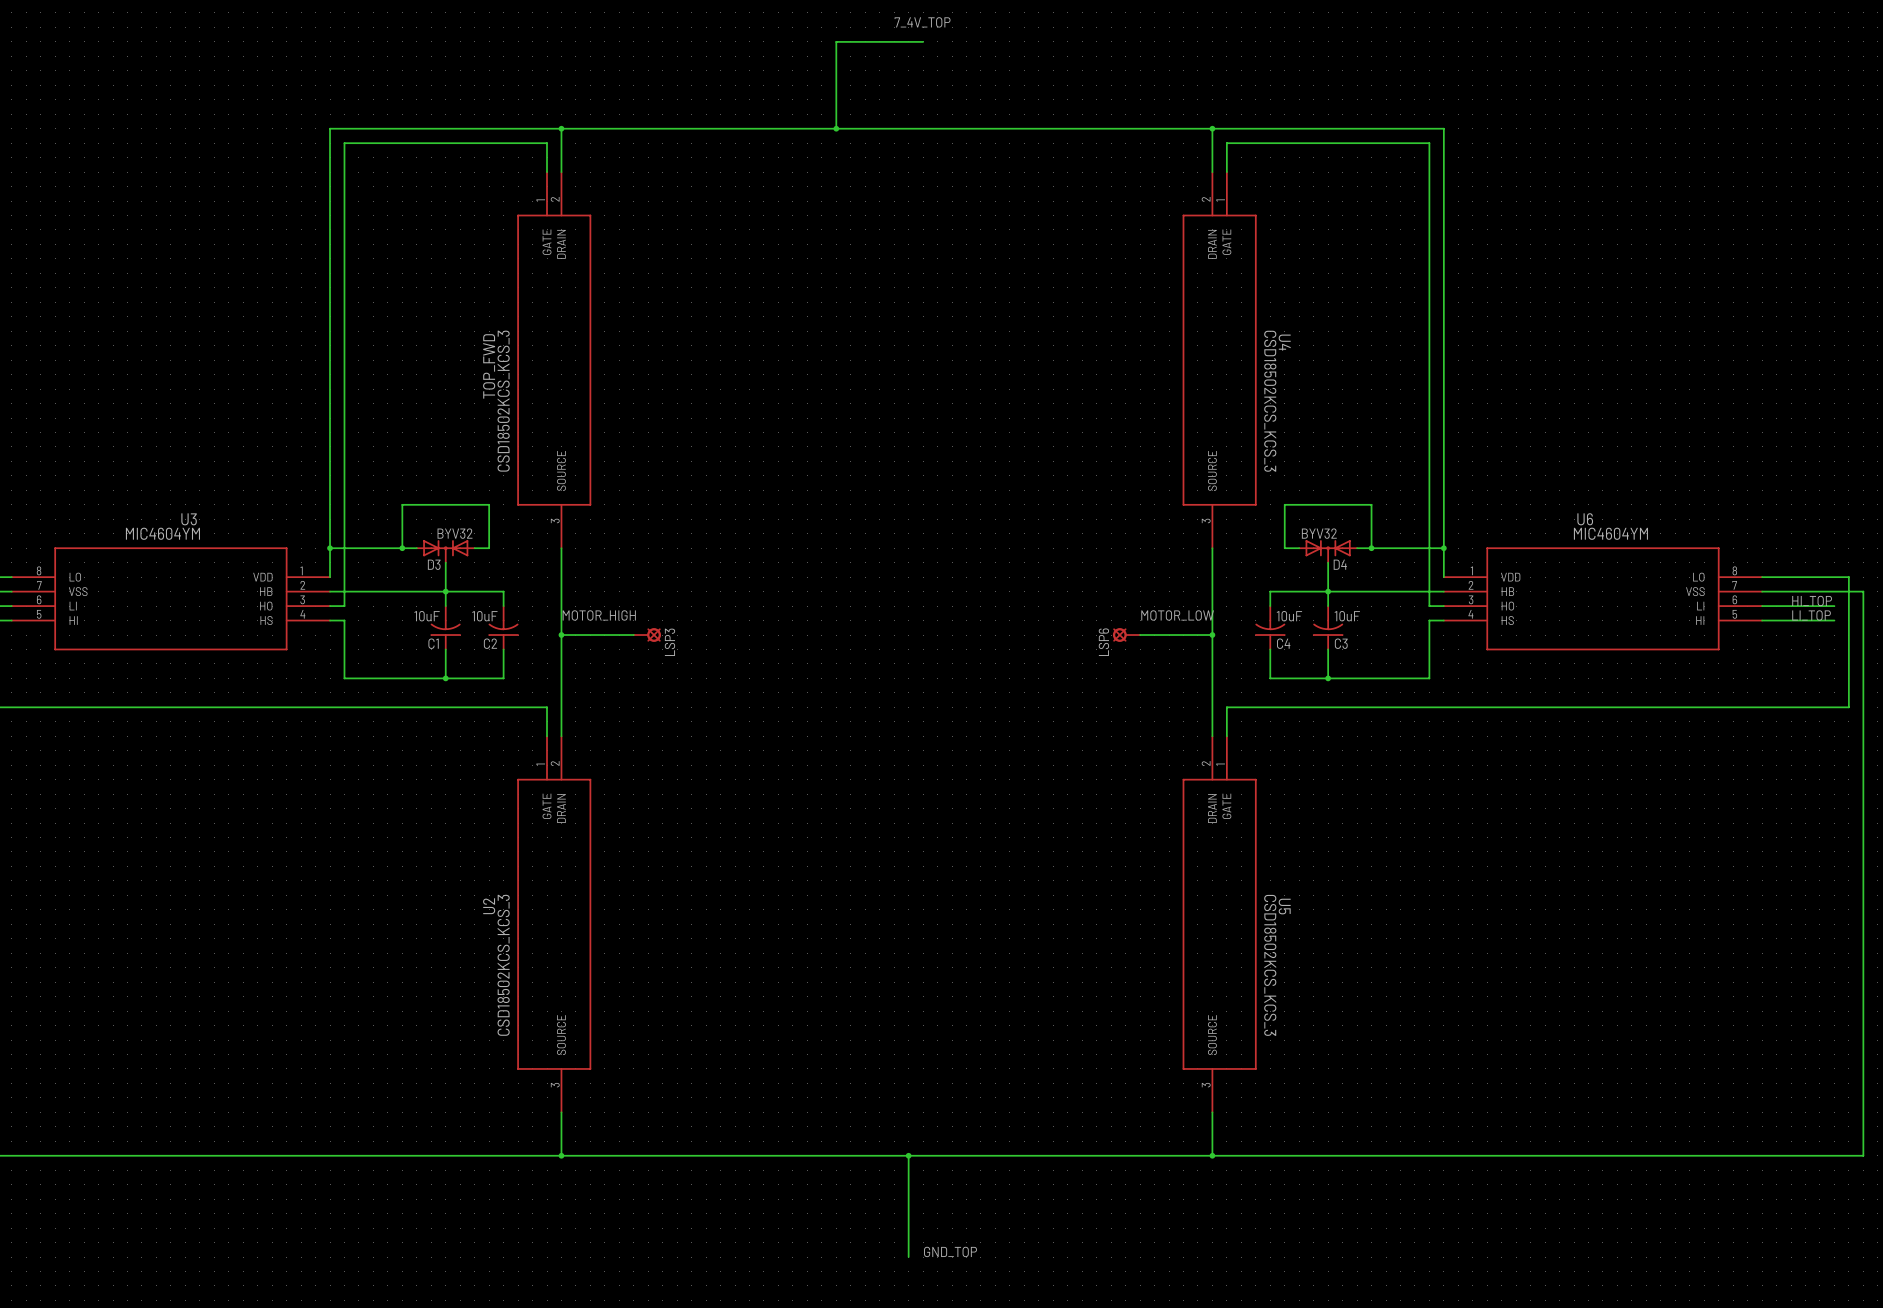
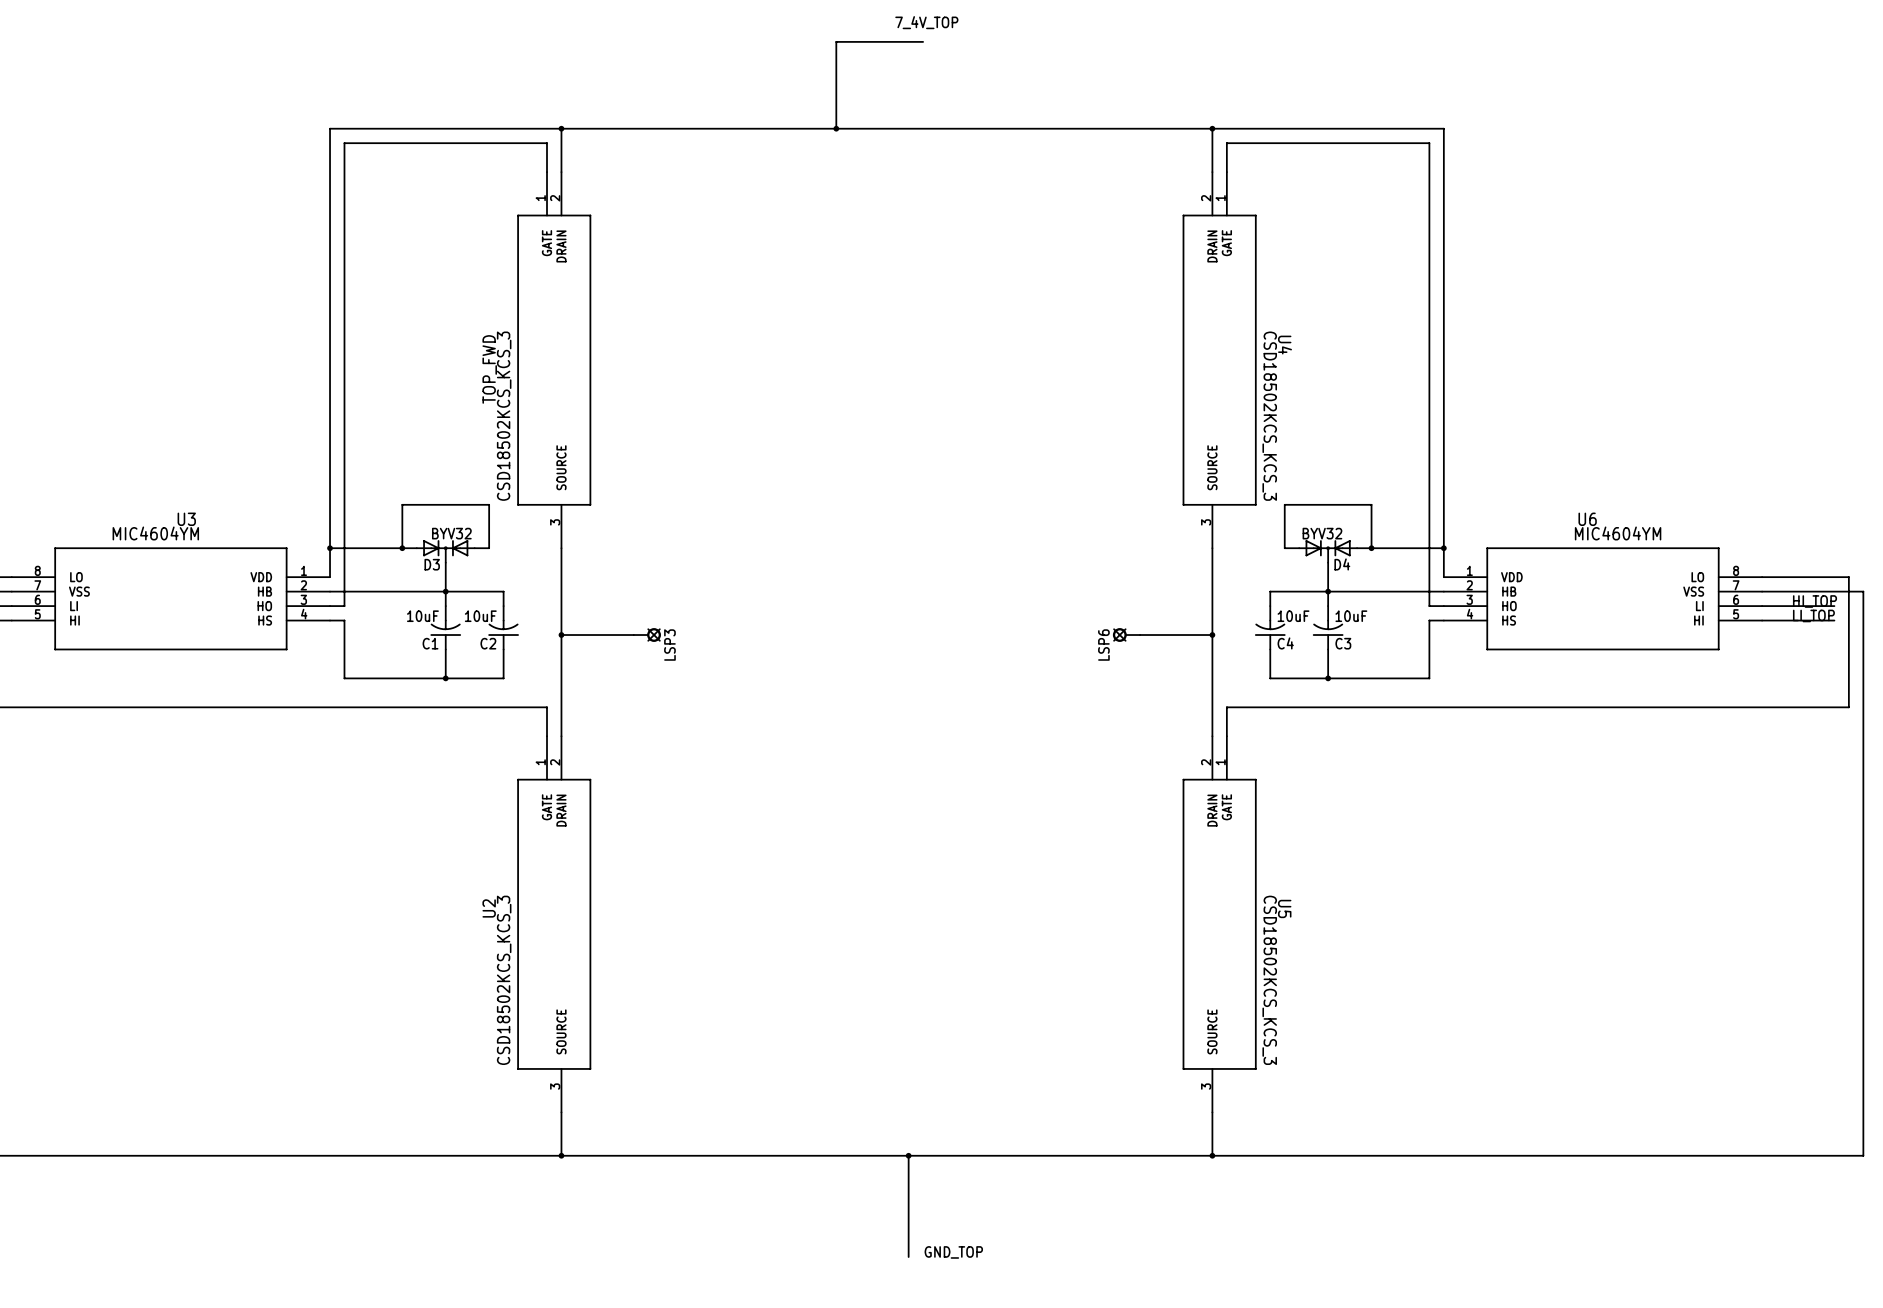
label: MOTOR_HIGH (599, 615) -> none
label: MOTOR_LOW (1177, 615) -> none

